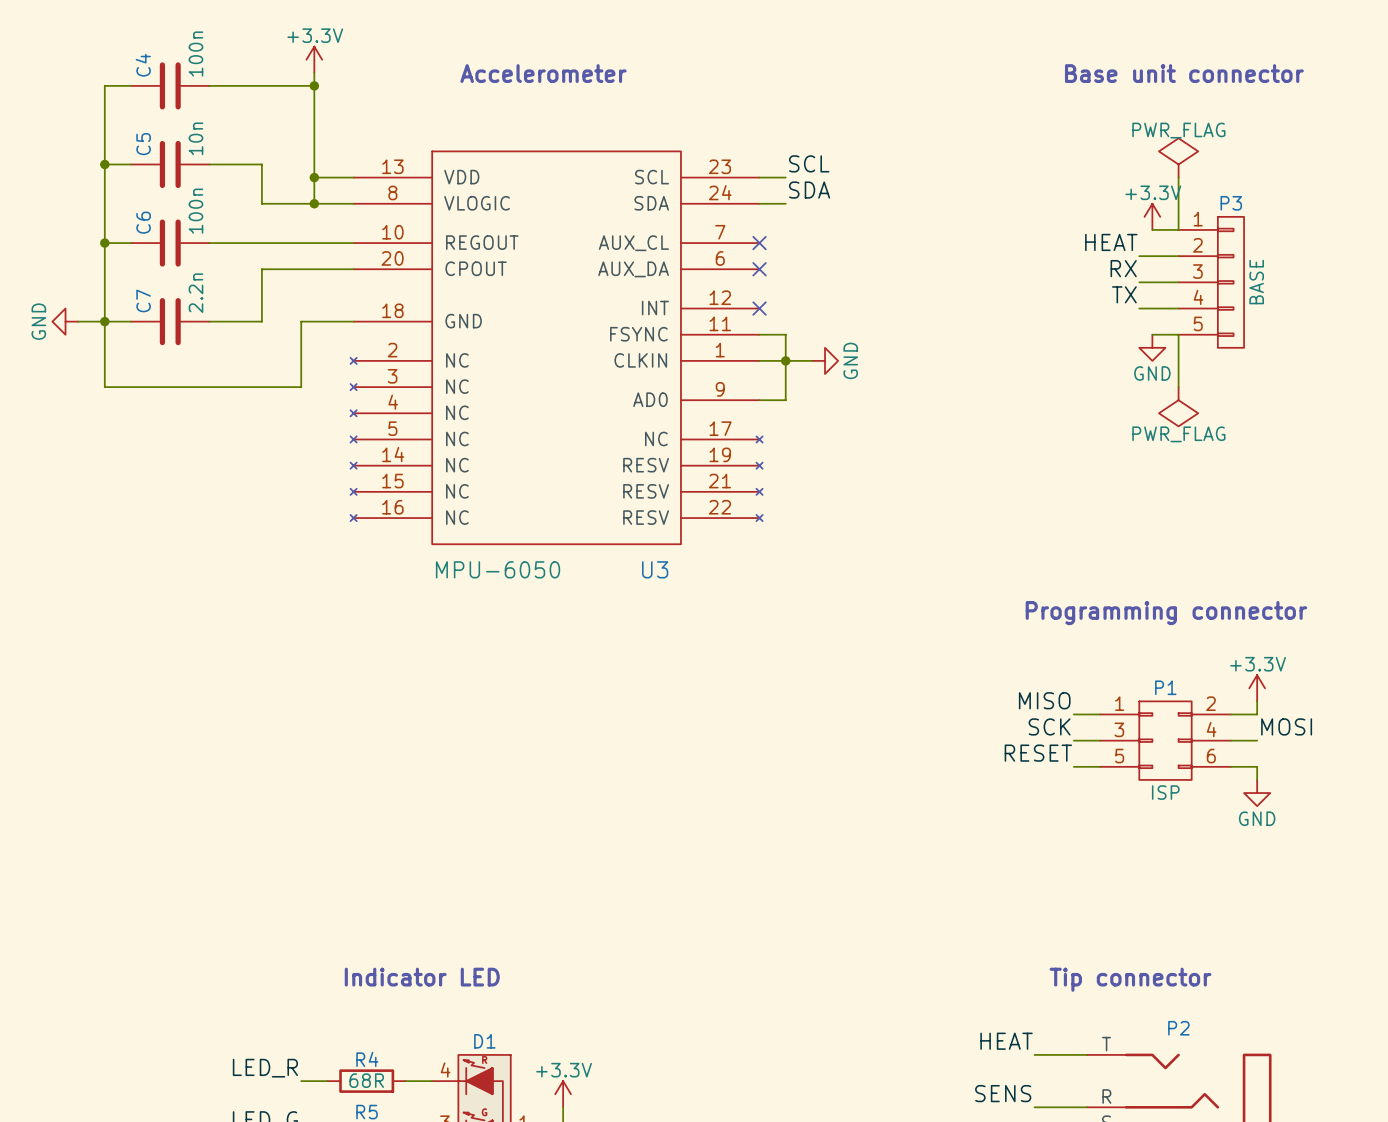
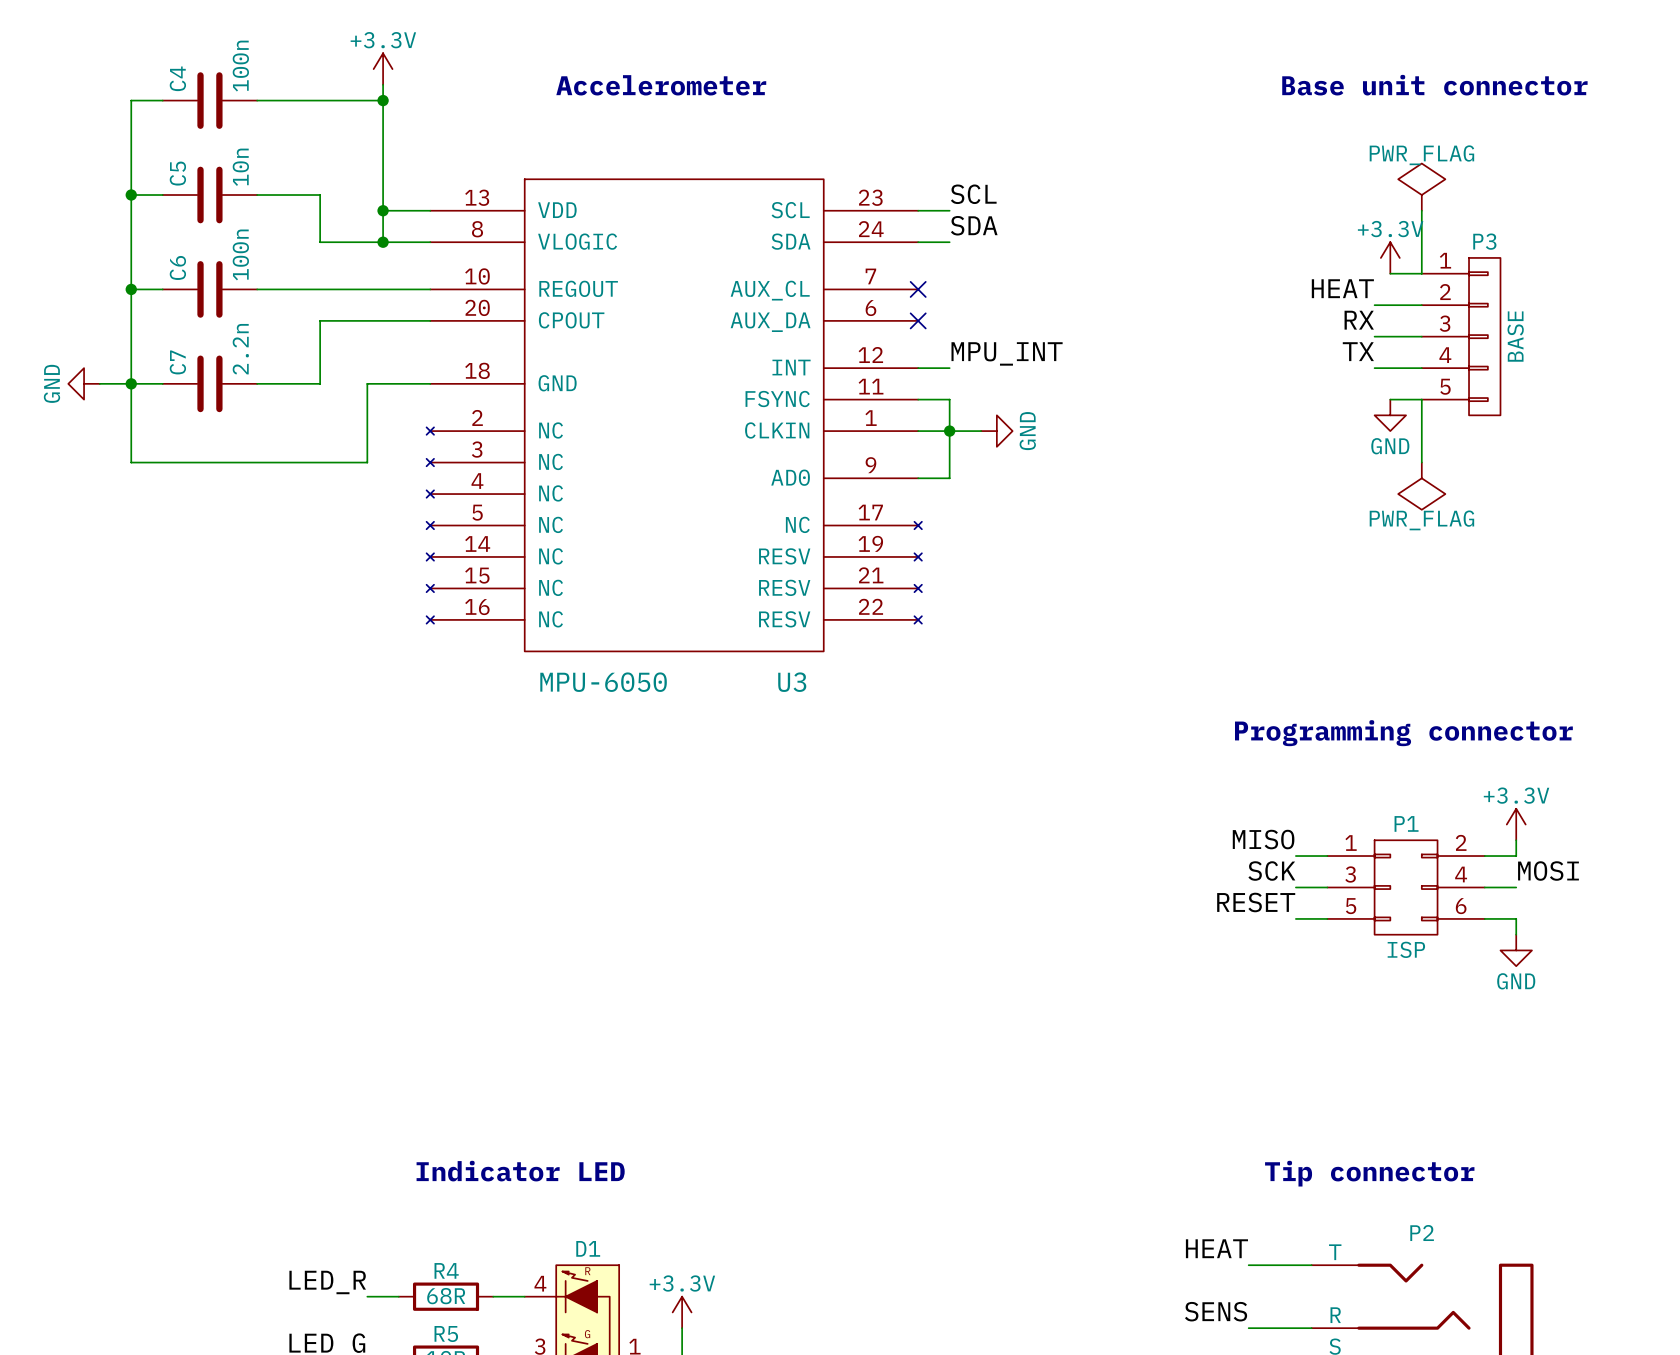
label: none -> MPU_INT (1007, 353)
wire: none -> (918, 368) (949, 368)
no-connect mark: (759, 308) -> none

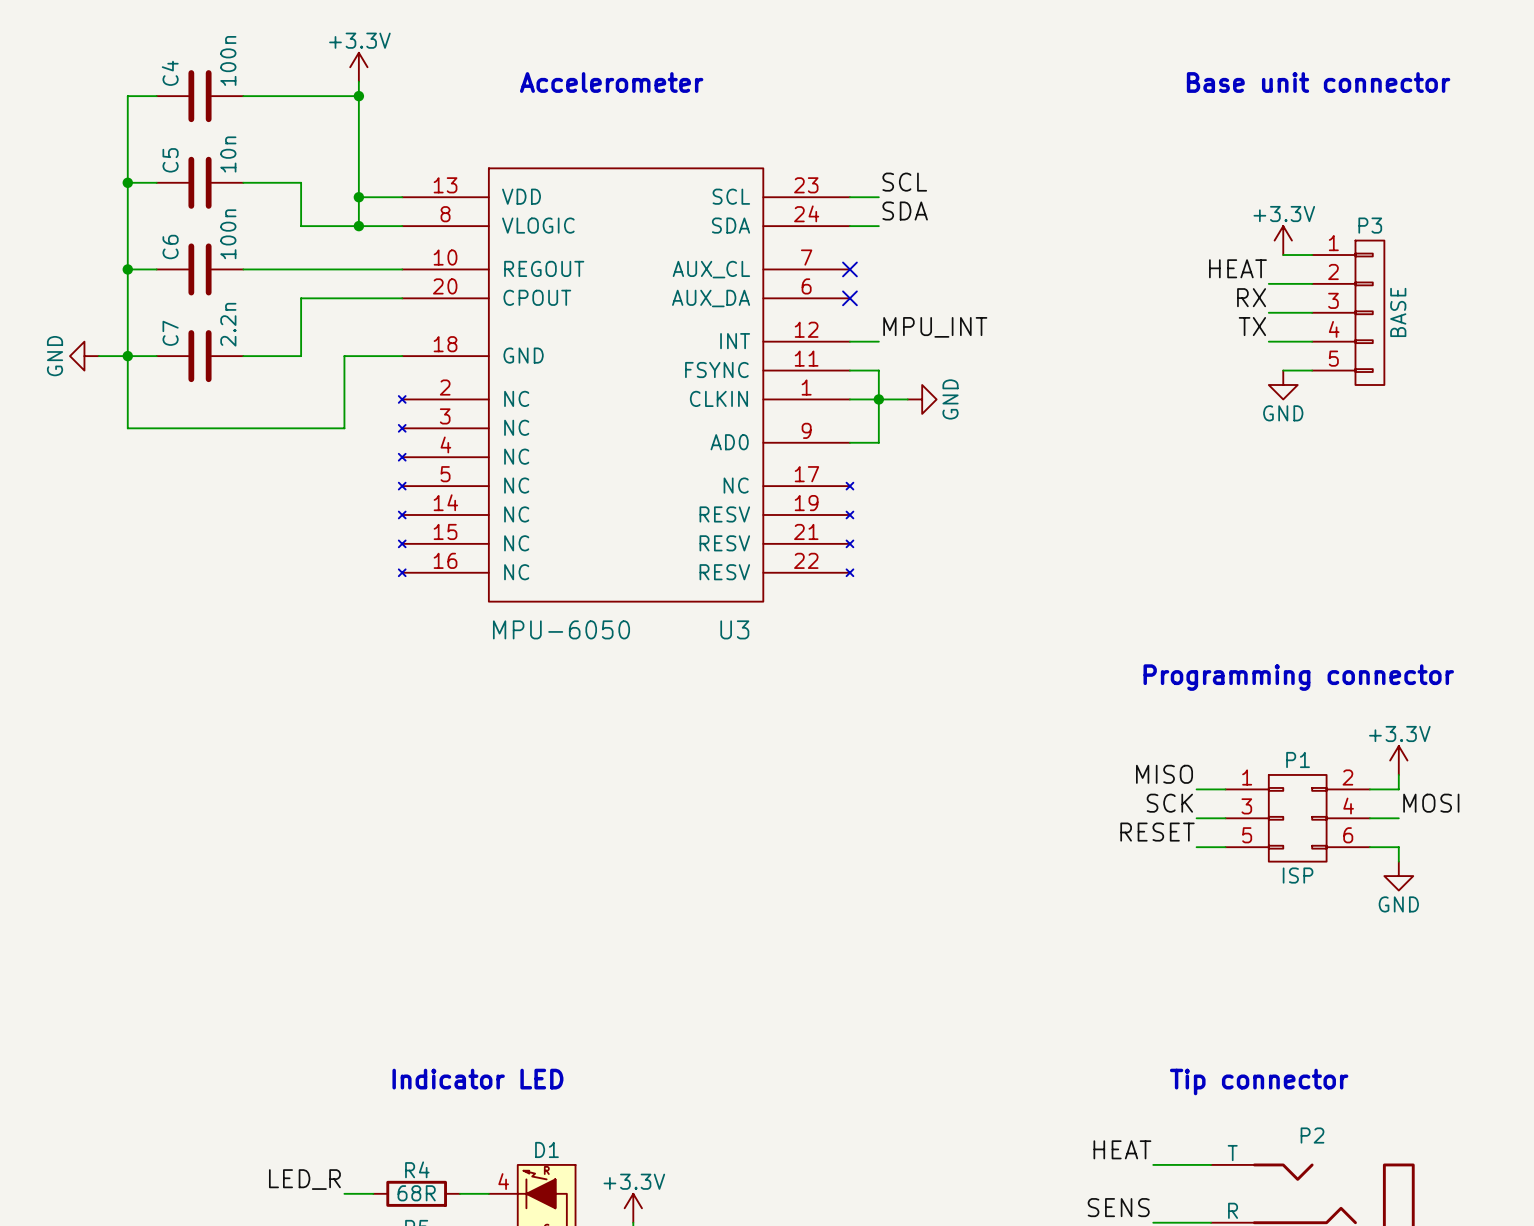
power symbol: PWR_FLAG (1421, 187) -> none
wire: (1421, 210) (1421, 273) -> none
wire: (1421, 399) (1421, 462) -> none
power symbol: PWR_FLAG (1421, 486) -> none

